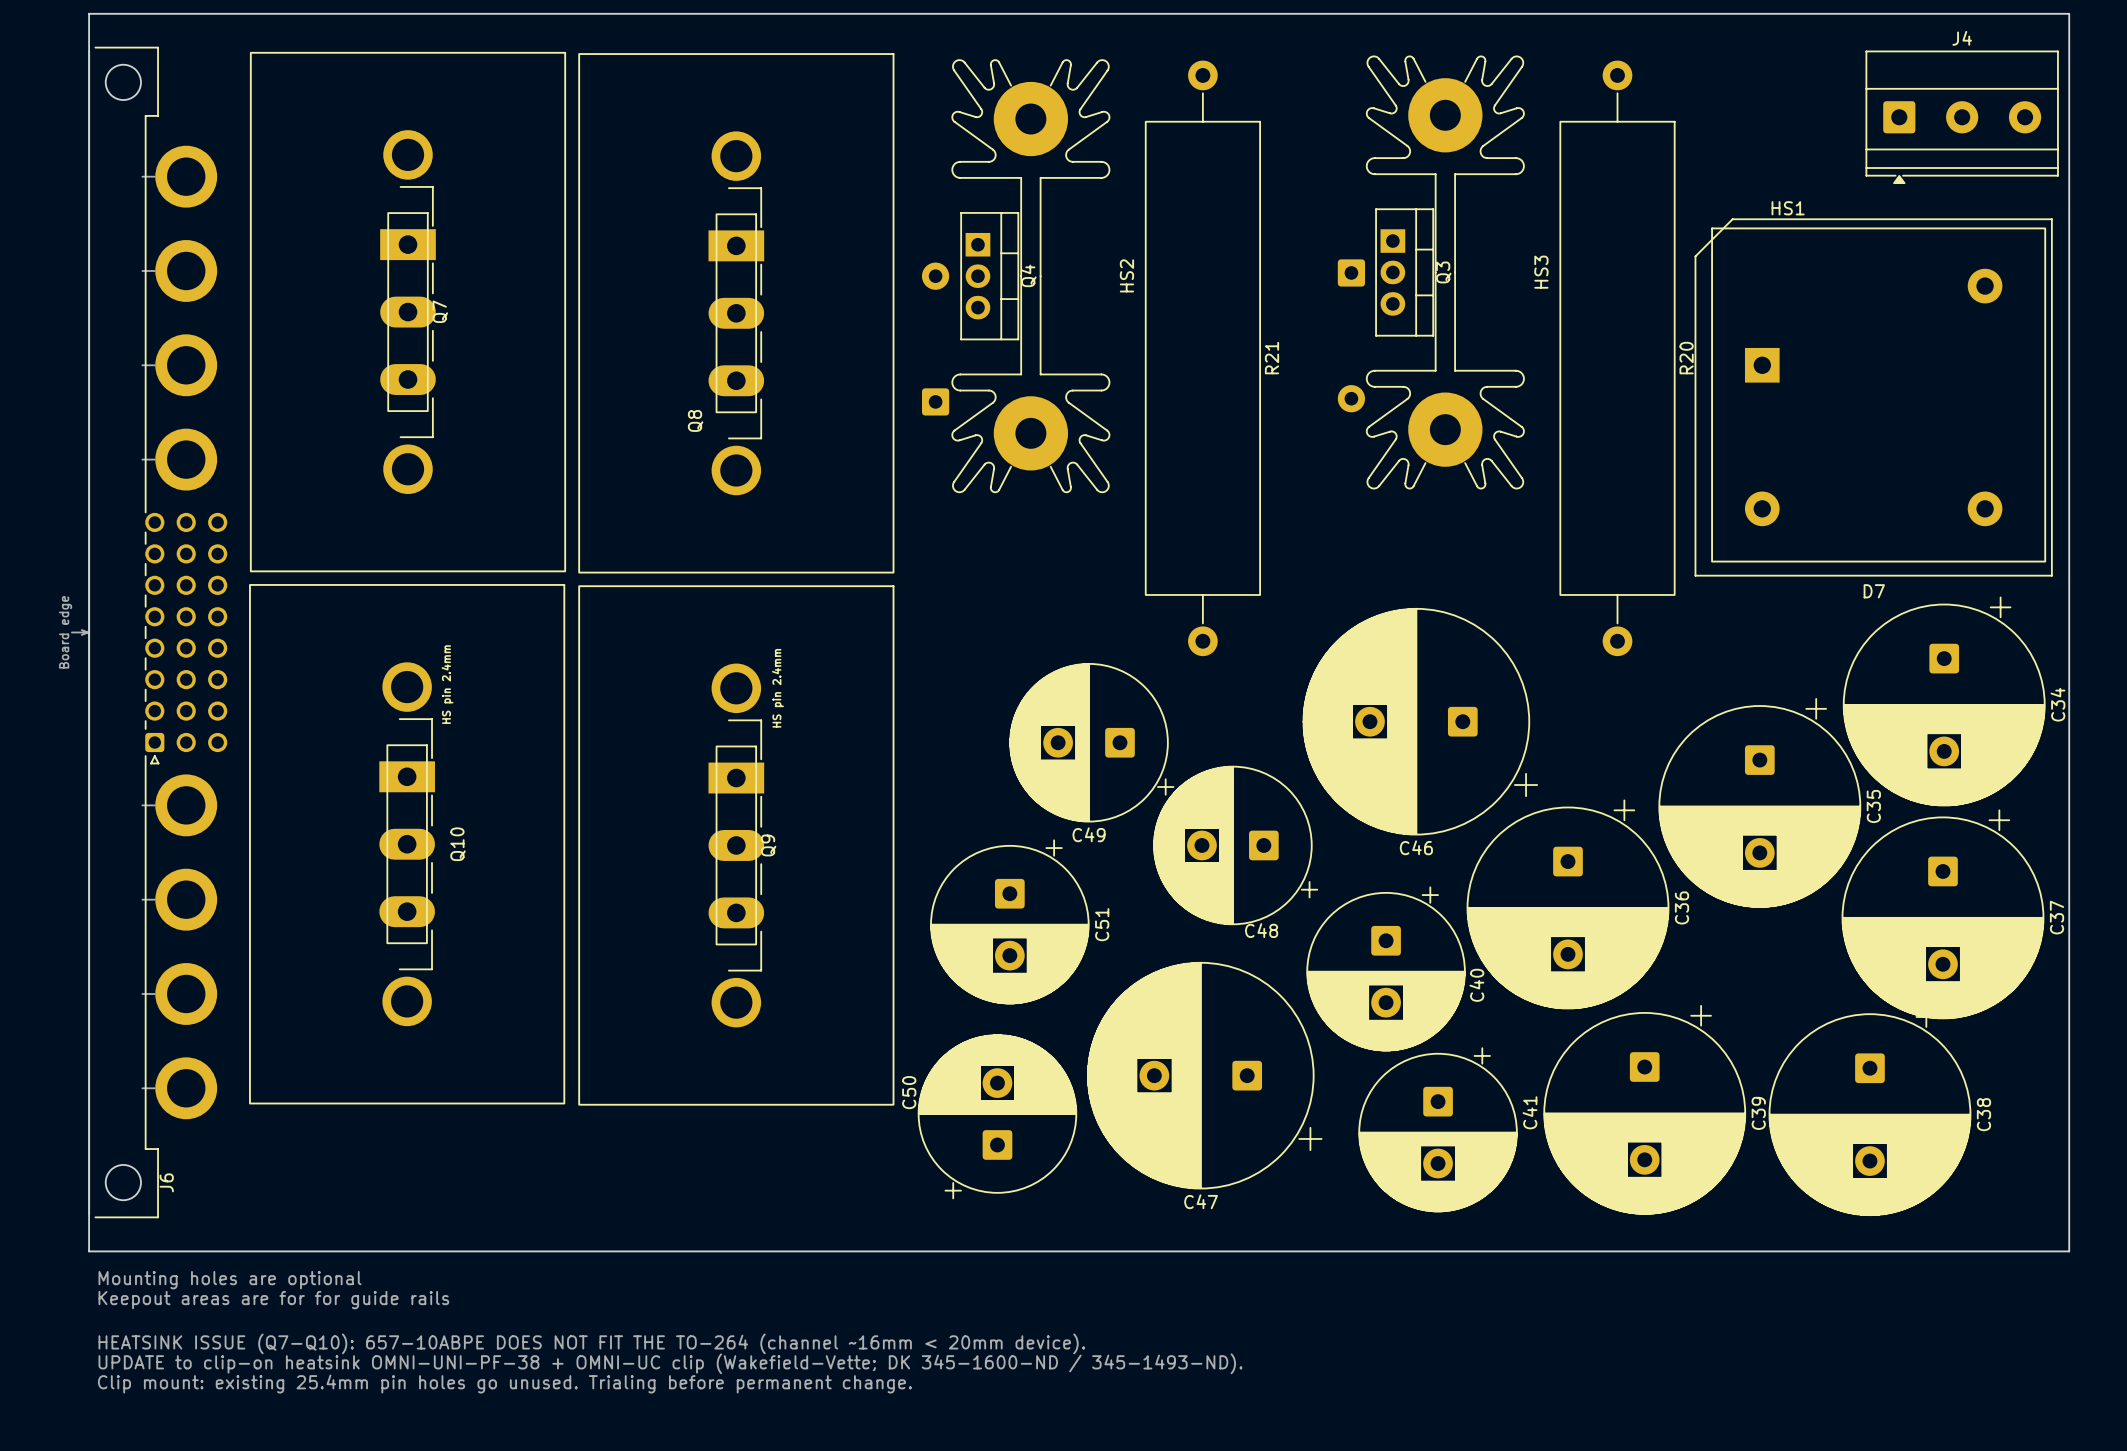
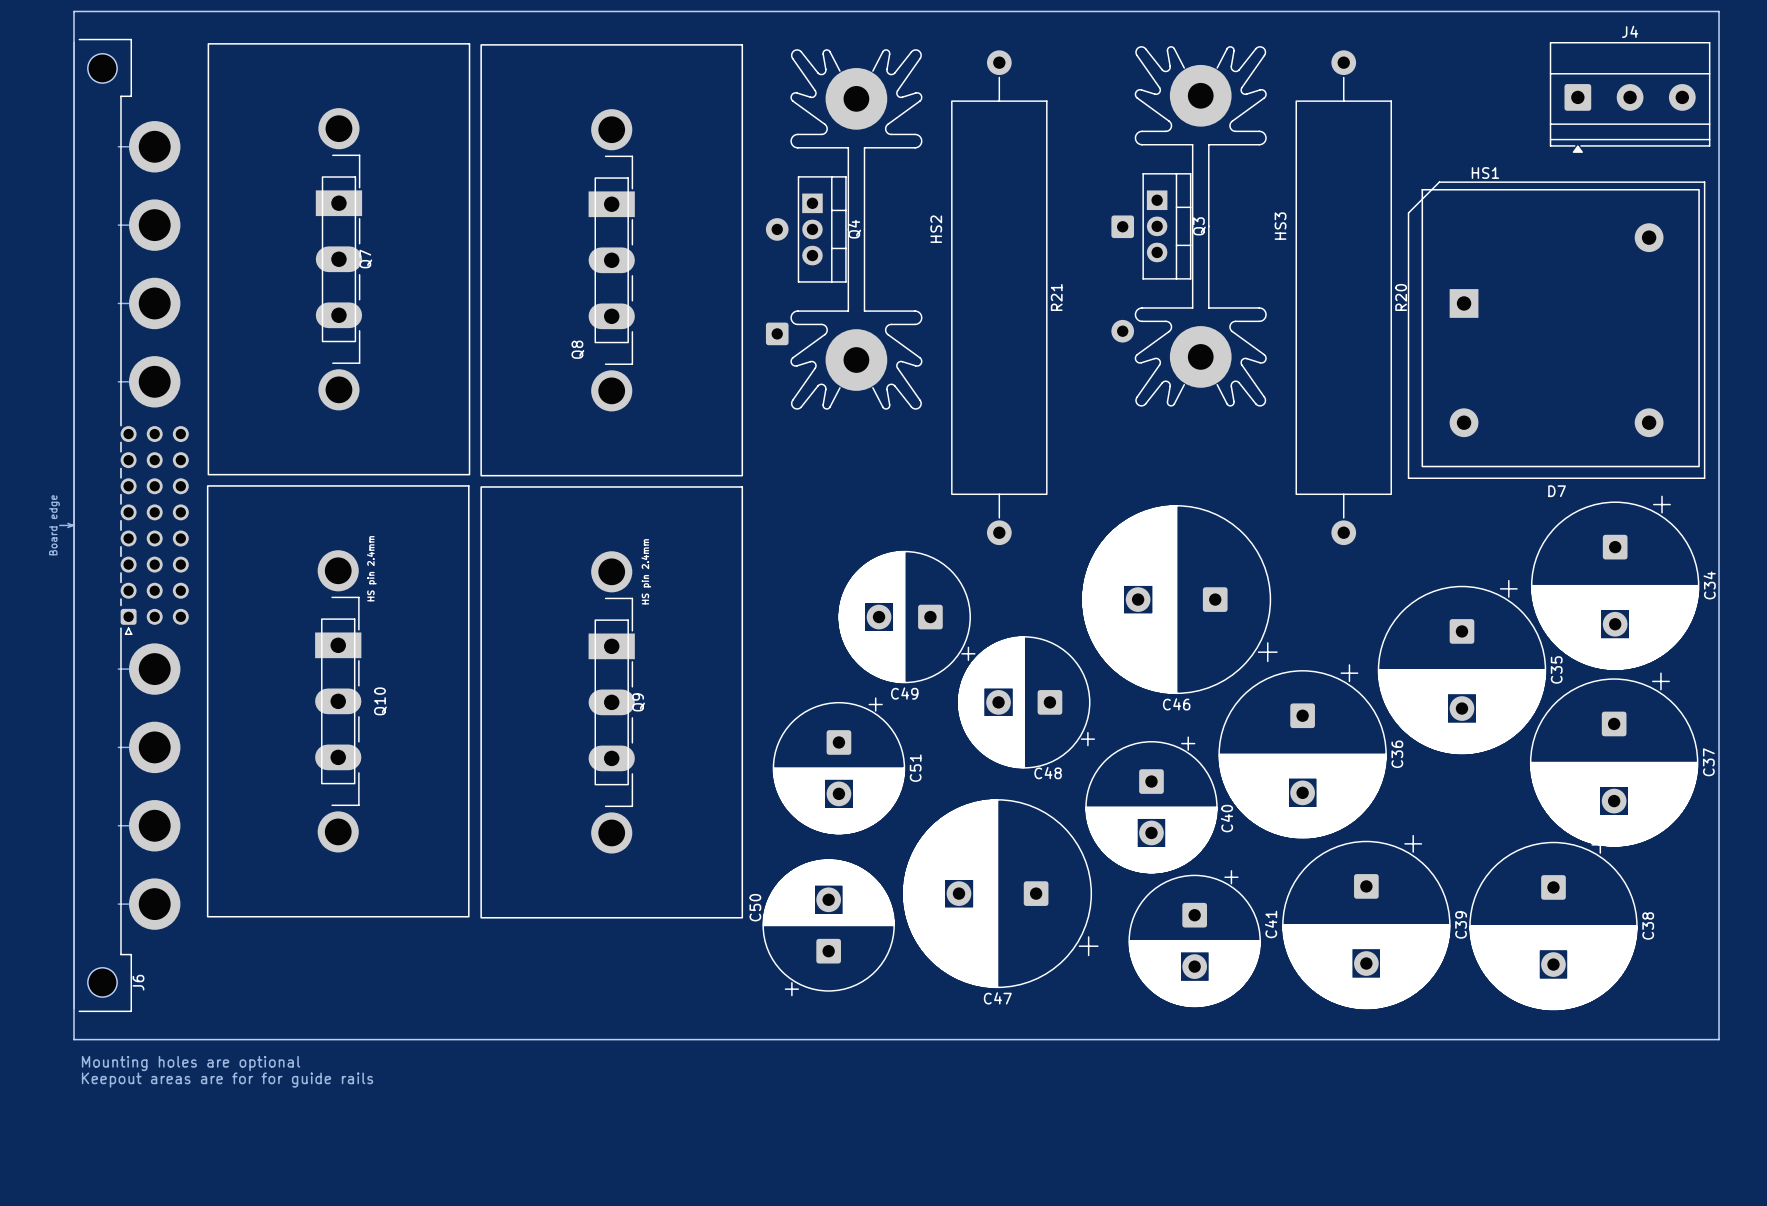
text: HEATSINK ISSUE (Q7-Q10): 657-10ABPE DOES NOT FIT THE TO-264 (channel ~16mm < 20mm device). (591, 1343) -> none
text: UPDATE to clip-on heatsink OMNI-UNI-PF-38 + OMNI-UC clip (Wakefield-Vette; DK 345-1600-ND / 345-1493-ND). (670, 1363) -> none
text: Clip mount: existing 25.4mm pin holes go unused. Trialing before permanent change. (504, 1384) -> none

